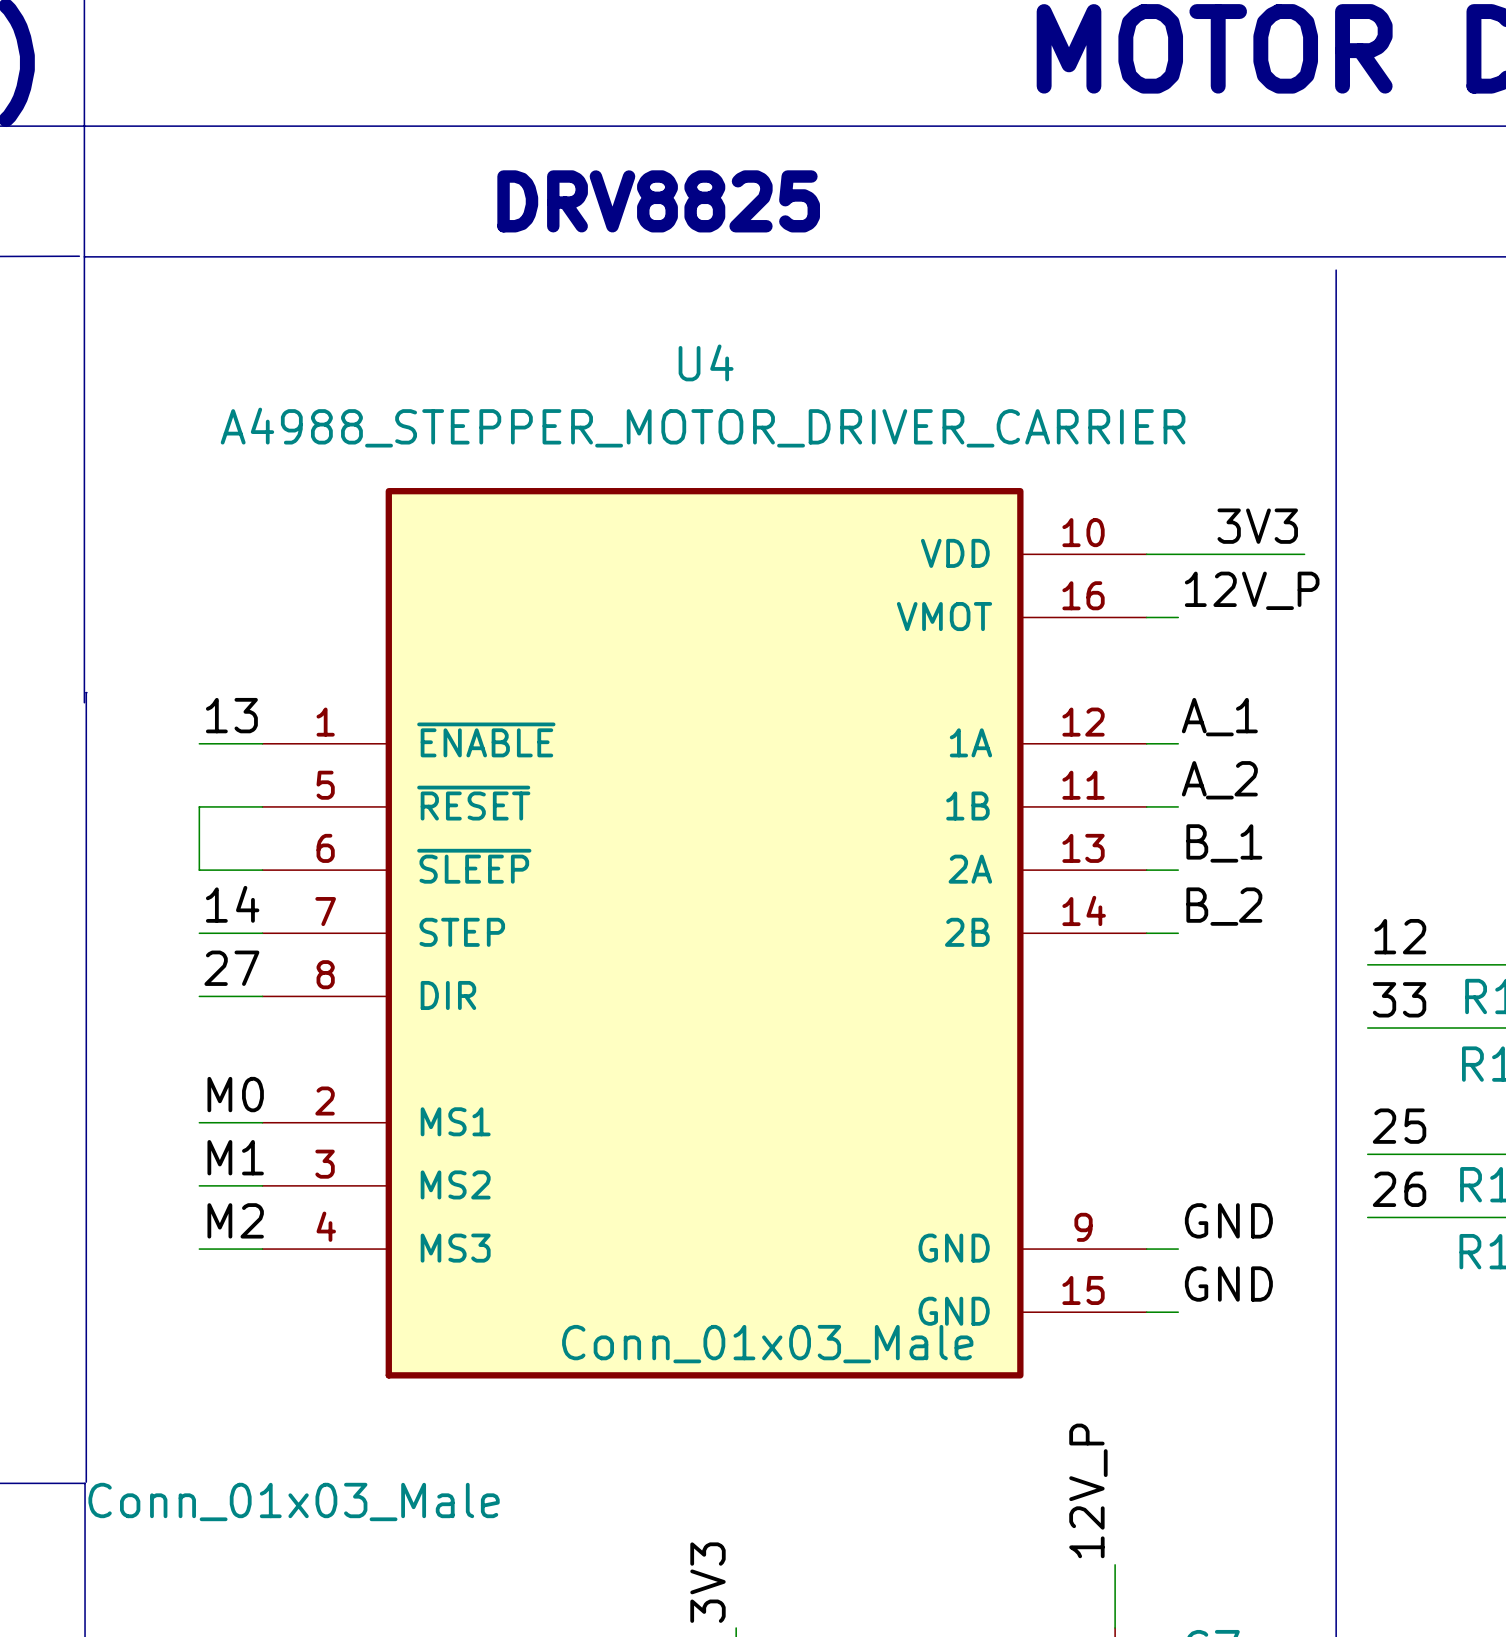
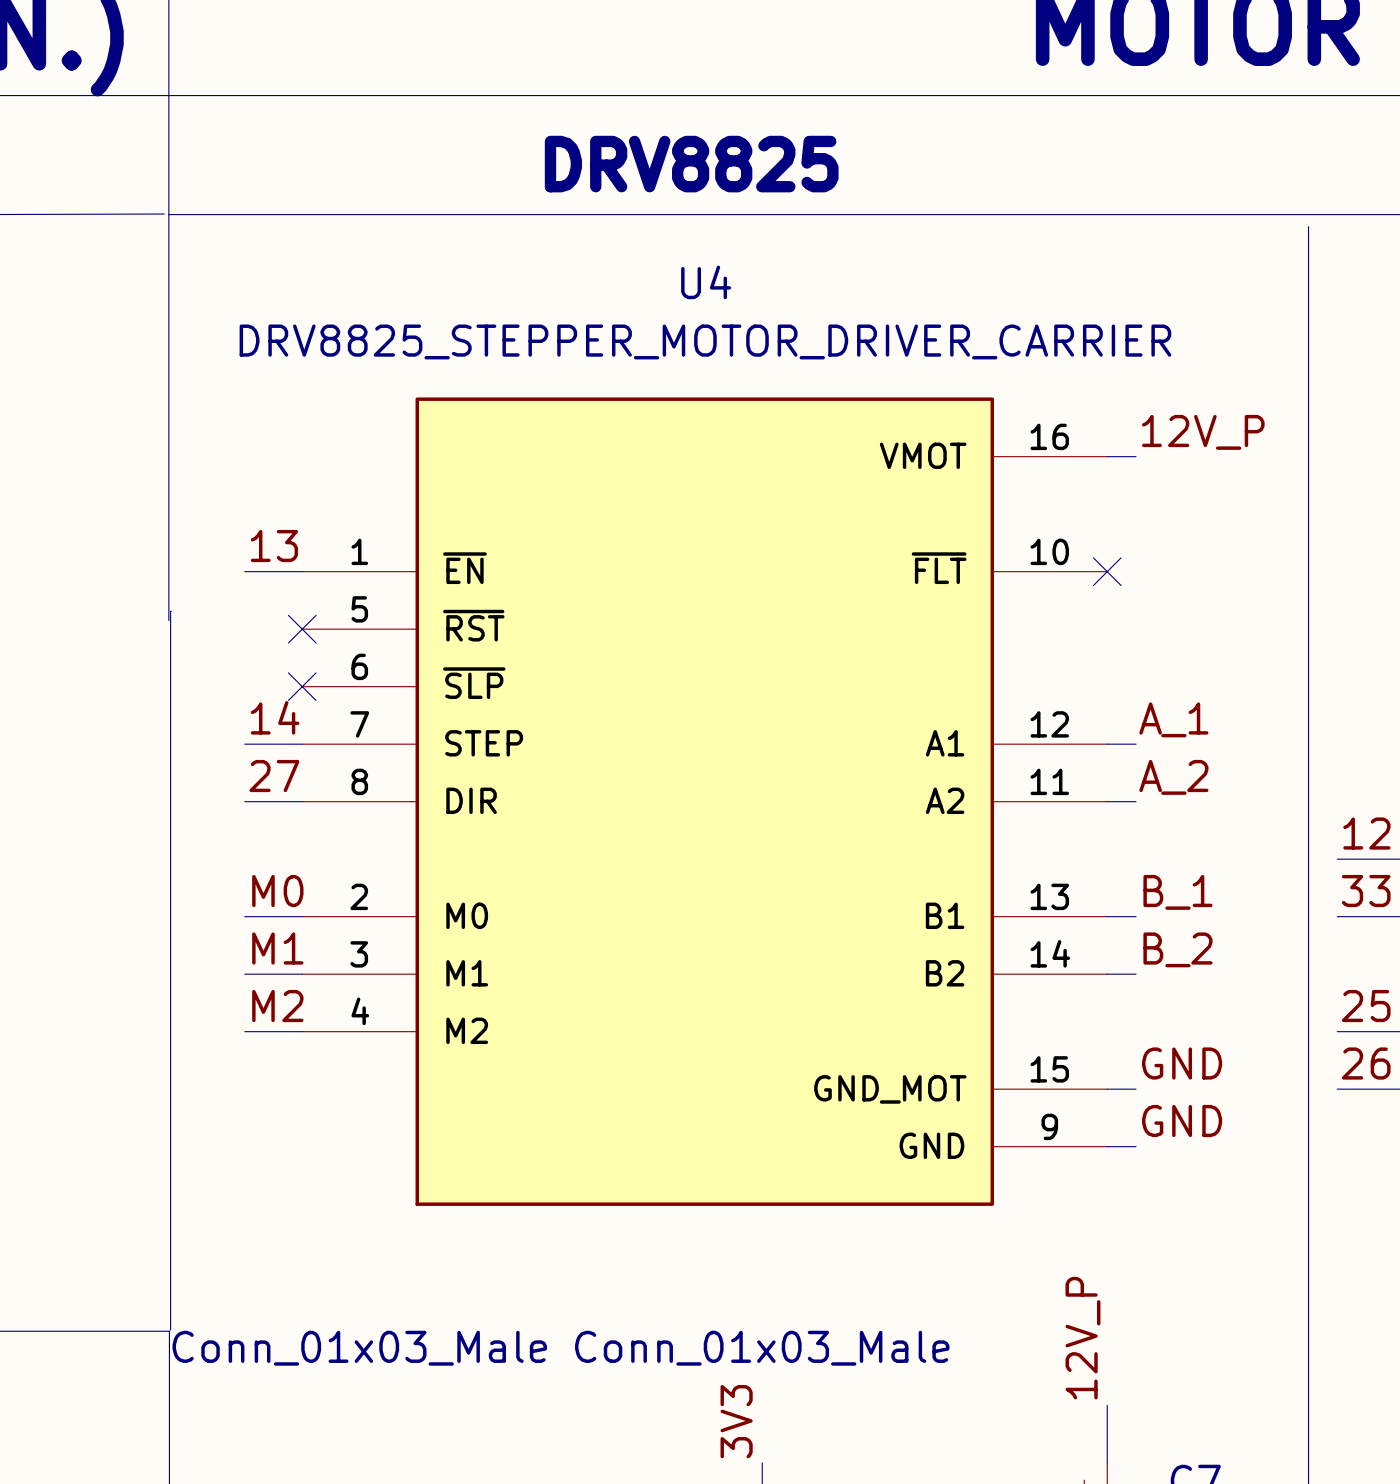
U4 value: A4988_STEPPER_MOTOR_DRIVER_CARRIER (703, 427) -> DRV8825_STEPPER_MOTOR_DRIVER_CARRIER (705, 341)
U4 symbol: [262, 488, 1147, 1379] -> [302, 397, 1108, 1206]
label: 3V3 (1257, 526) -> none
wire: (1146, 554) (1304, 554) -> none
label position: 12V_P (1252, 590) -> 12V_P (1203, 432)
wire: (1146, 617) (1178, 617) -> (1107, 456) (1136, 456)
no-connect mark: none -> (1107, 571)
no-connect mark: none -> (302, 629)
label position: 13 (231, 715) -> 13 (274, 546)
label position: A_1 (1219, 717) -> A_1 (1173, 719)
wire: (199, 743) (262, 743) -> (244, 571) (302, 571)
wire: (1146, 743) (1178, 743) -> (1107, 974) (1136, 974)
no-connect mark: none -> (302, 686)
label position: A_2 (1219, 780) -> A_2 (1173, 777)
wire: (262, 806) (199, 806) (199, 870) (262, 870) -> none
wire: (1146, 806) (1178, 806) -> (1107, 801) (1136, 801)
label position: B_1 (1224, 843) -> B_1 (1177, 892)
wire: (1146, 870) (1178, 870) -> (1107, 916) (1136, 916)
label position: 14 (232, 904) -> 14 (275, 717)
label position: B_2 (1224, 906) -> B_2 (1177, 949)
wire: (199, 933) (262, 933) -> (244, 744) (302, 744)
wire: (1146, 933) (1178, 933) -> (1107, 744) (1136, 744)
label position: 27 (231, 968) -> 27 (274, 776)
wire: (199, 996) (262, 996) -> (244, 801) (302, 801)
label position: M0 (235, 1094) -> M0 (277, 891)
wire: (199, 1122) (262, 1122) -> (244, 916) (302, 916)
label position: M1 (235, 1157) -> M1 (277, 948)
wire: (199, 1185) (262, 1185) -> (244, 974) (302, 974)
label: none -> GND (1182, 1063)
label position: M2 (235, 1220) -> M2 (277, 1006)
label: GND (1228, 1220) -> none
wire: (199, 1249) (262, 1249) -> (244, 1031) (302, 1031)
wire: (1146, 1249) (1178, 1249) -> (1107, 1146) (1136, 1146)
label: none -> GND (1182, 1121)
label: GND (1228, 1284) -> none
wire: (1146, 1312) (1178, 1312) -> (1107, 1089) (1136, 1089)
part value position: Conn_01x03_Male (767, 1344) -> Conn_01x03_Male (762, 1348)

